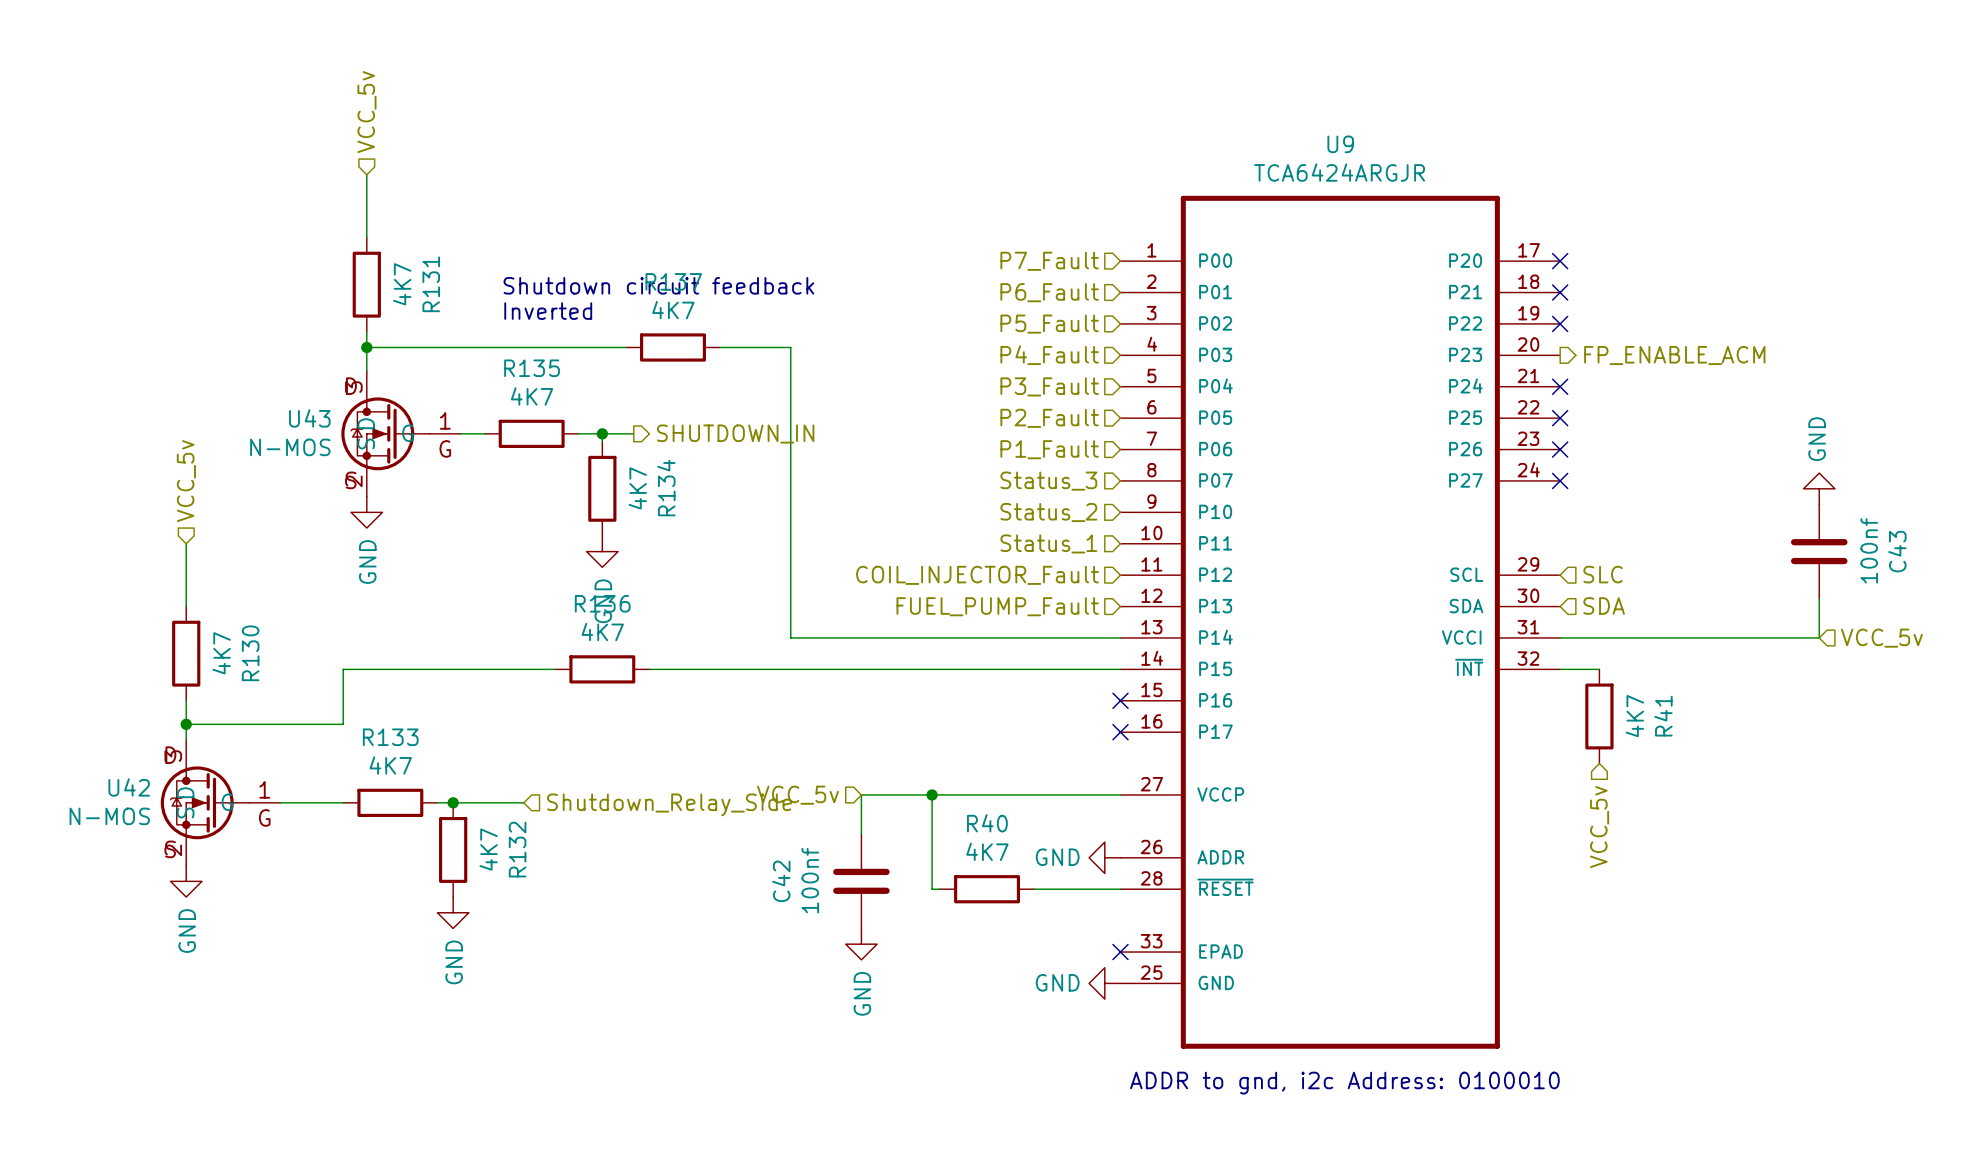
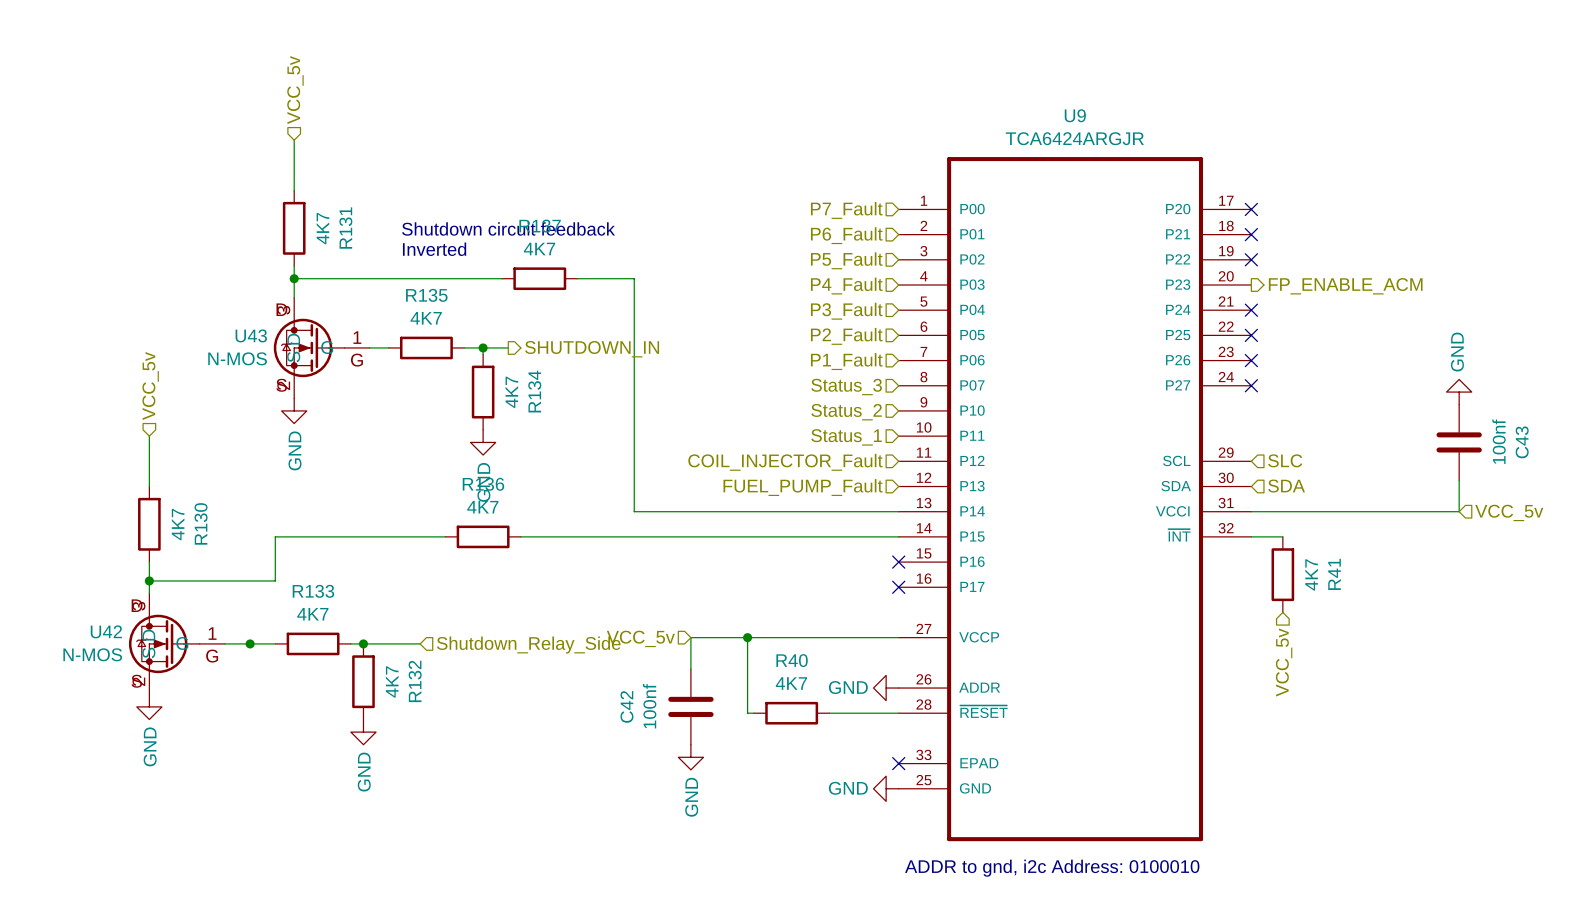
junction: none -> (250, 643)

